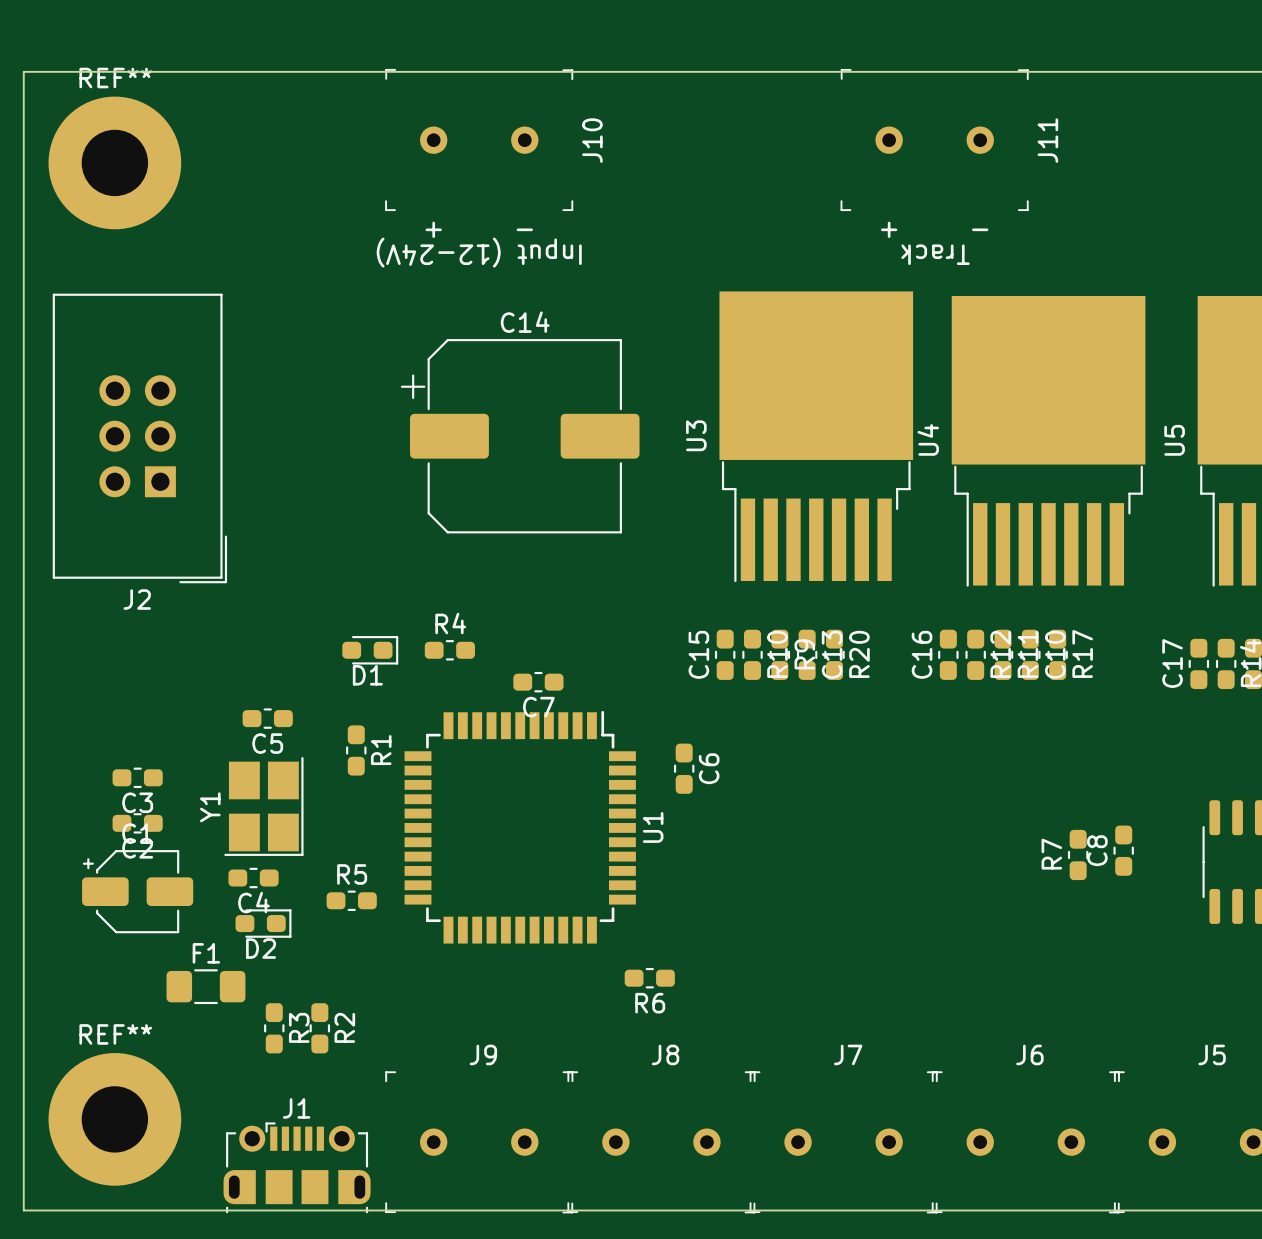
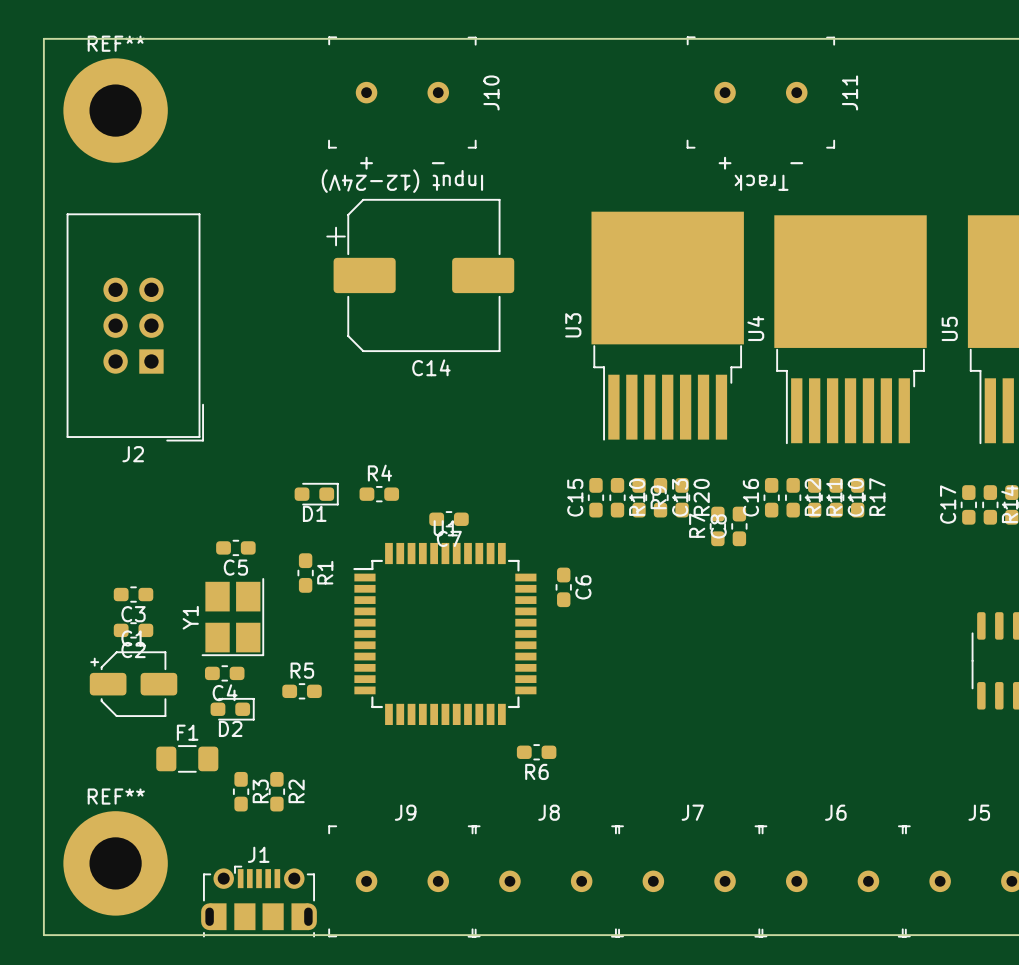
C14 name position: C14 (525, 322) -> C14 (431, 367)
C14 position: (520, 436) -> (420, 275)
U1 rotation: 0° (520, 827) -> 90° counterclockwise (444, 633)
C8 position: (1123, 850) -> (739, 526)
R7 position: (1078, 854) -> (717, 526)

